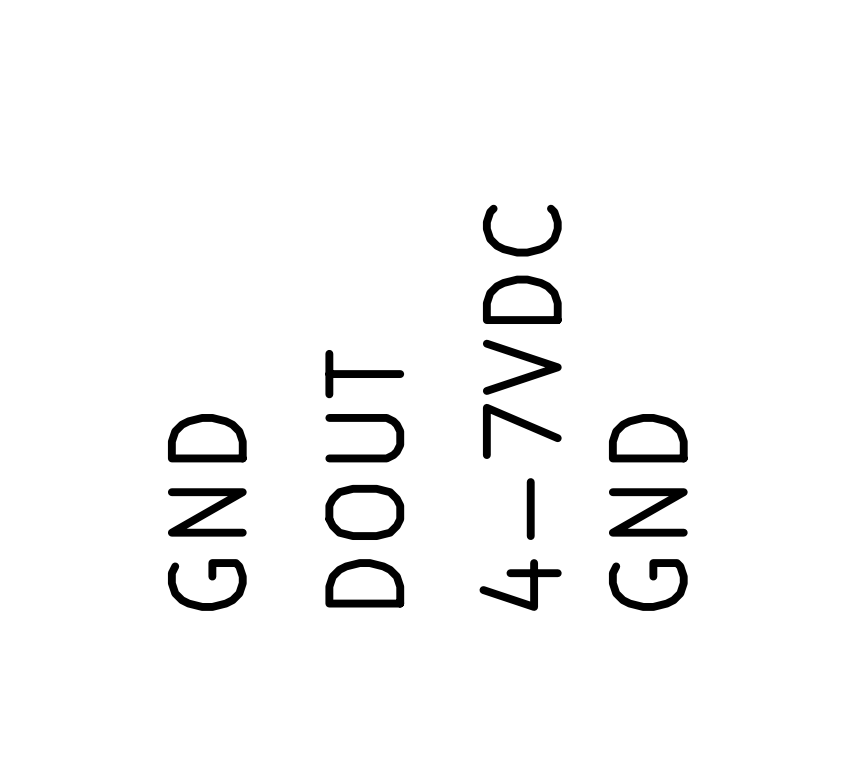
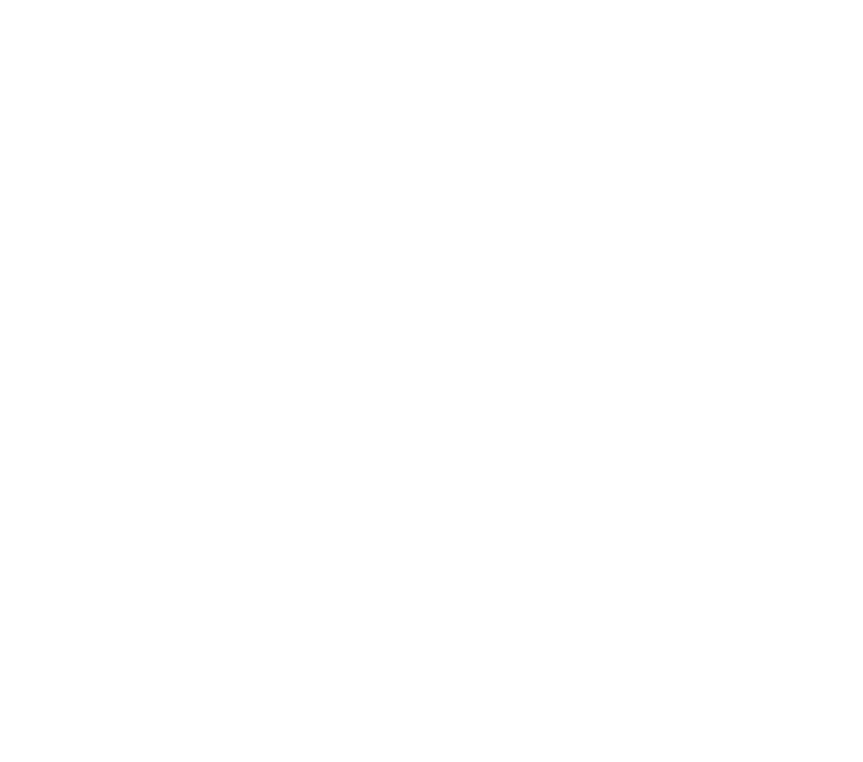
text: 4-7VDC (520, 407) -> none
text: DOUT (364, 478) -> none
text: GND (207, 512) -> none
text: GND (648, 512) -> none

